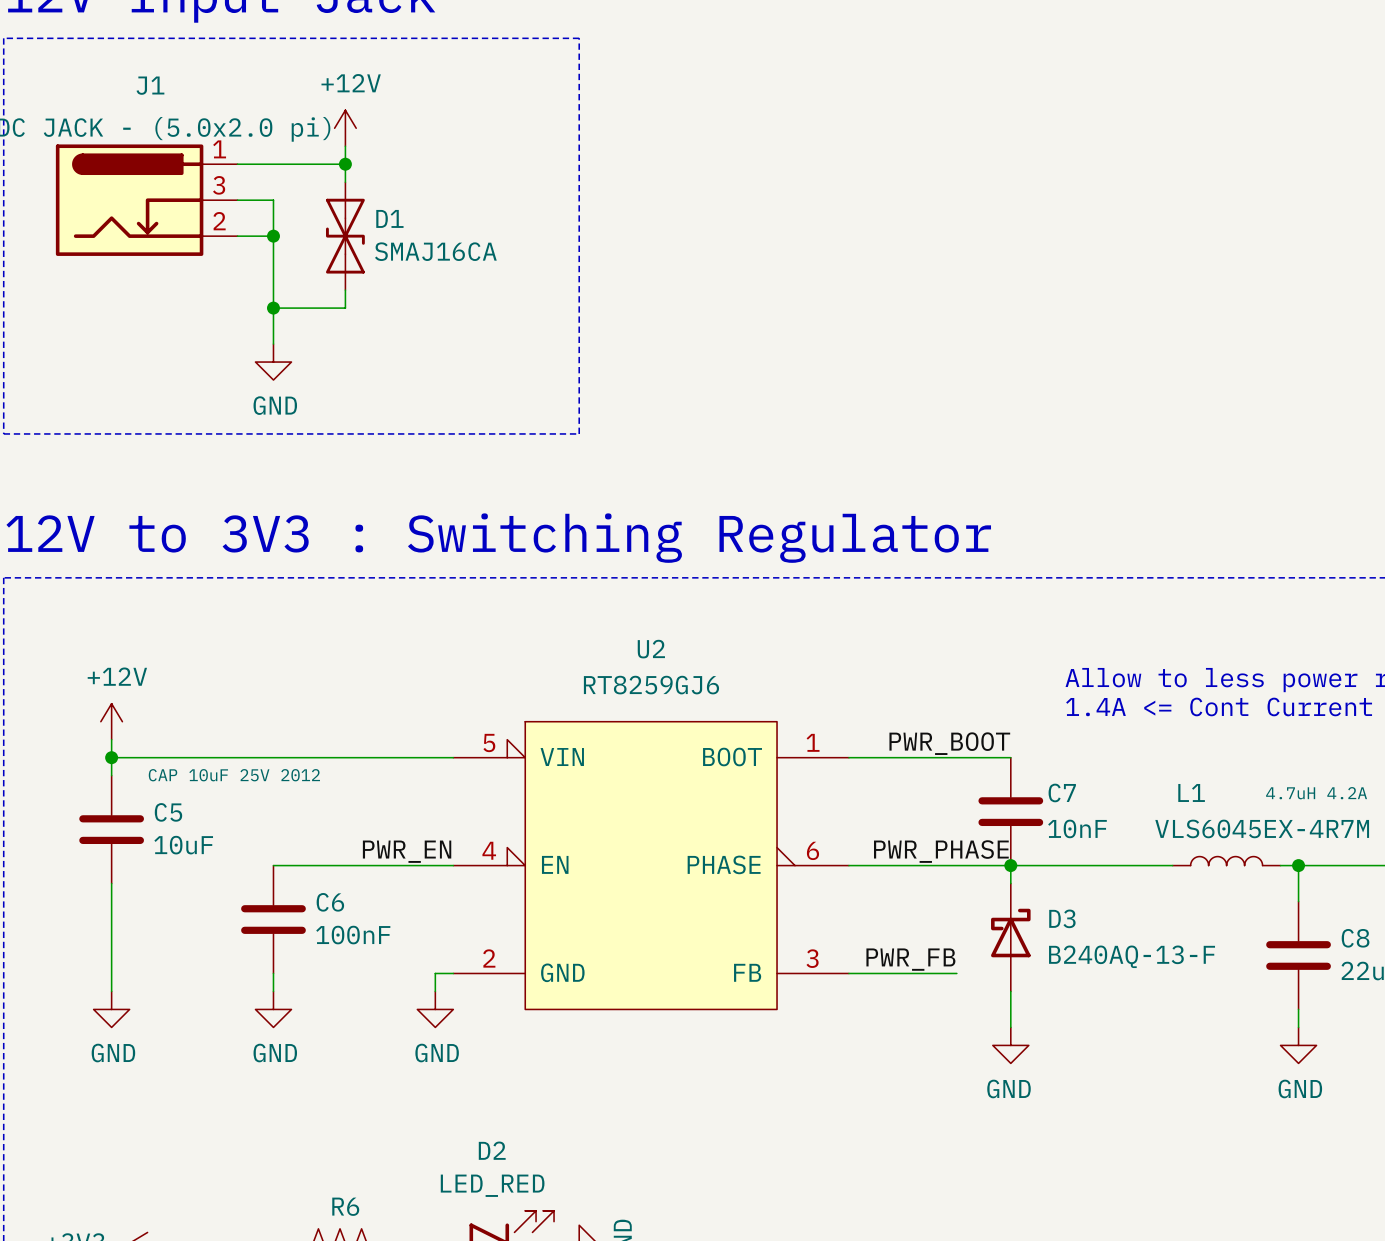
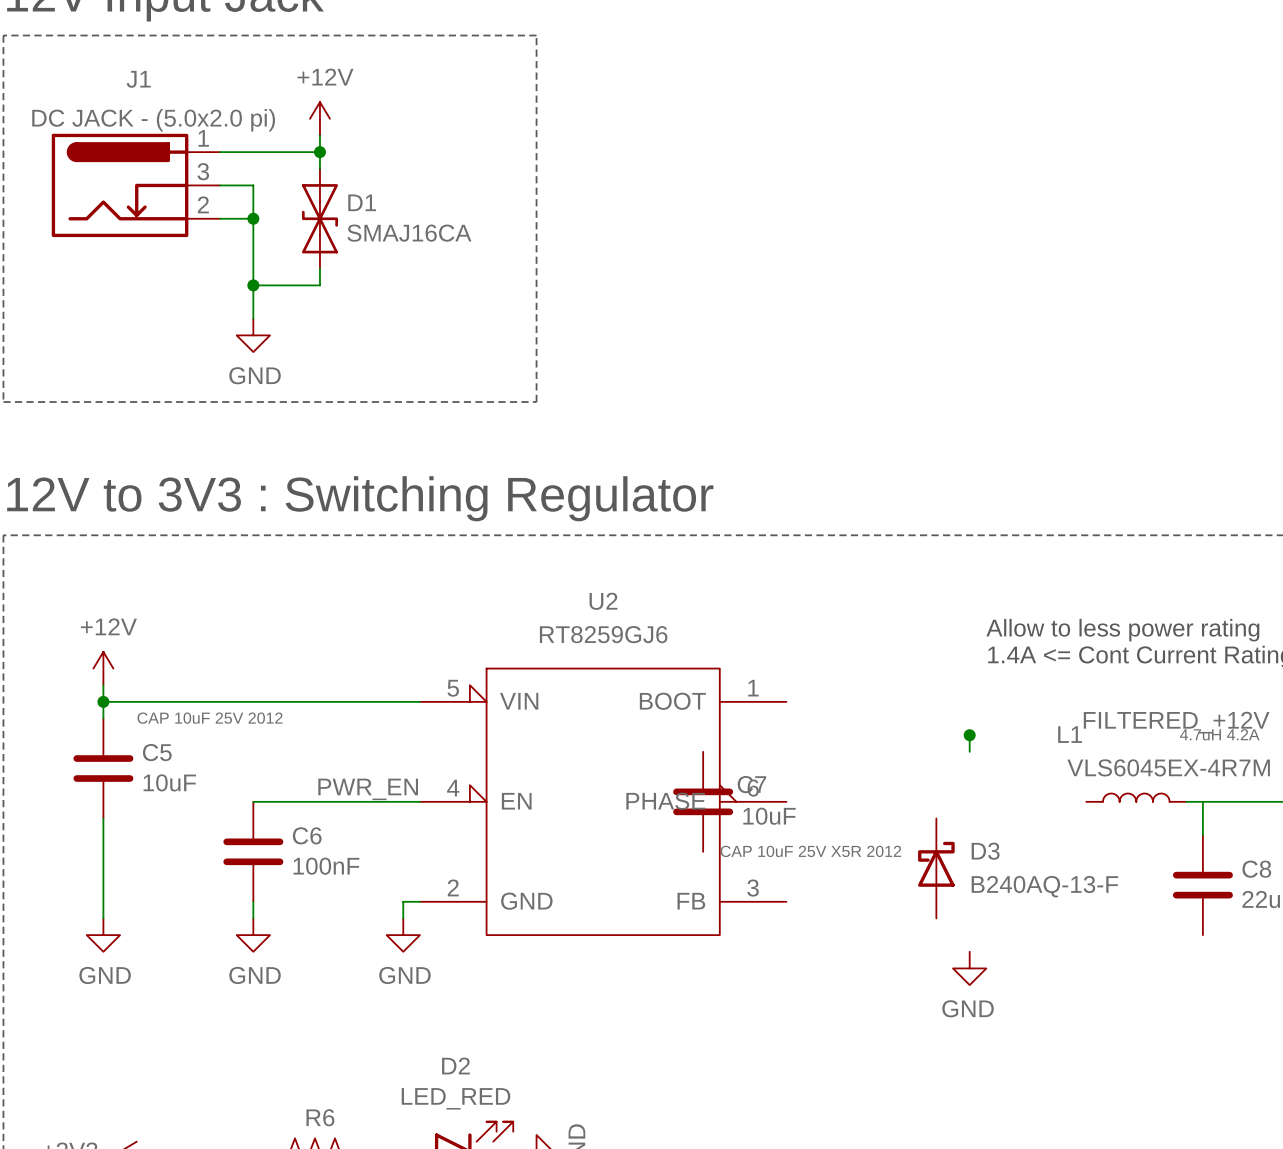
label: PWR_BOOT (949, 743) -> none
wire: (848, 757) (1010, 757) -> none
label: none -> FILTERED_+12V (1176, 722)
L1 name position: L1 (1191, 792) -> L1 (1070, 734)
C7 position: (1010, 811) -> (703, 801)
C7 value: 10nF (1077, 828) -> 10uF (769, 816)
label: PWR_PHASE (941, 851) -> none
wire: (848, 865) (1172, 865) -> none
wire: (1010, 865) (1010, 883) -> (969, 735) (969, 751)
junction position: (1010, 865) -> (969, 735)
junction: (1298, 865) -> none
C7 text: none -> CAP 10uF 25V X5R 2012 (810, 851)
label: PWR_FB (910, 959) -> none
wire: (848, 973) (956, 973) -> none
wire: (1010, 991) (1010, 1027) -> none
wire: (1298, 1009) (1298, 1027) -> none
power symbol position: GND (1010, 1045) -> GND (969, 968)
power symbol: GND (1298, 1045) -> none

